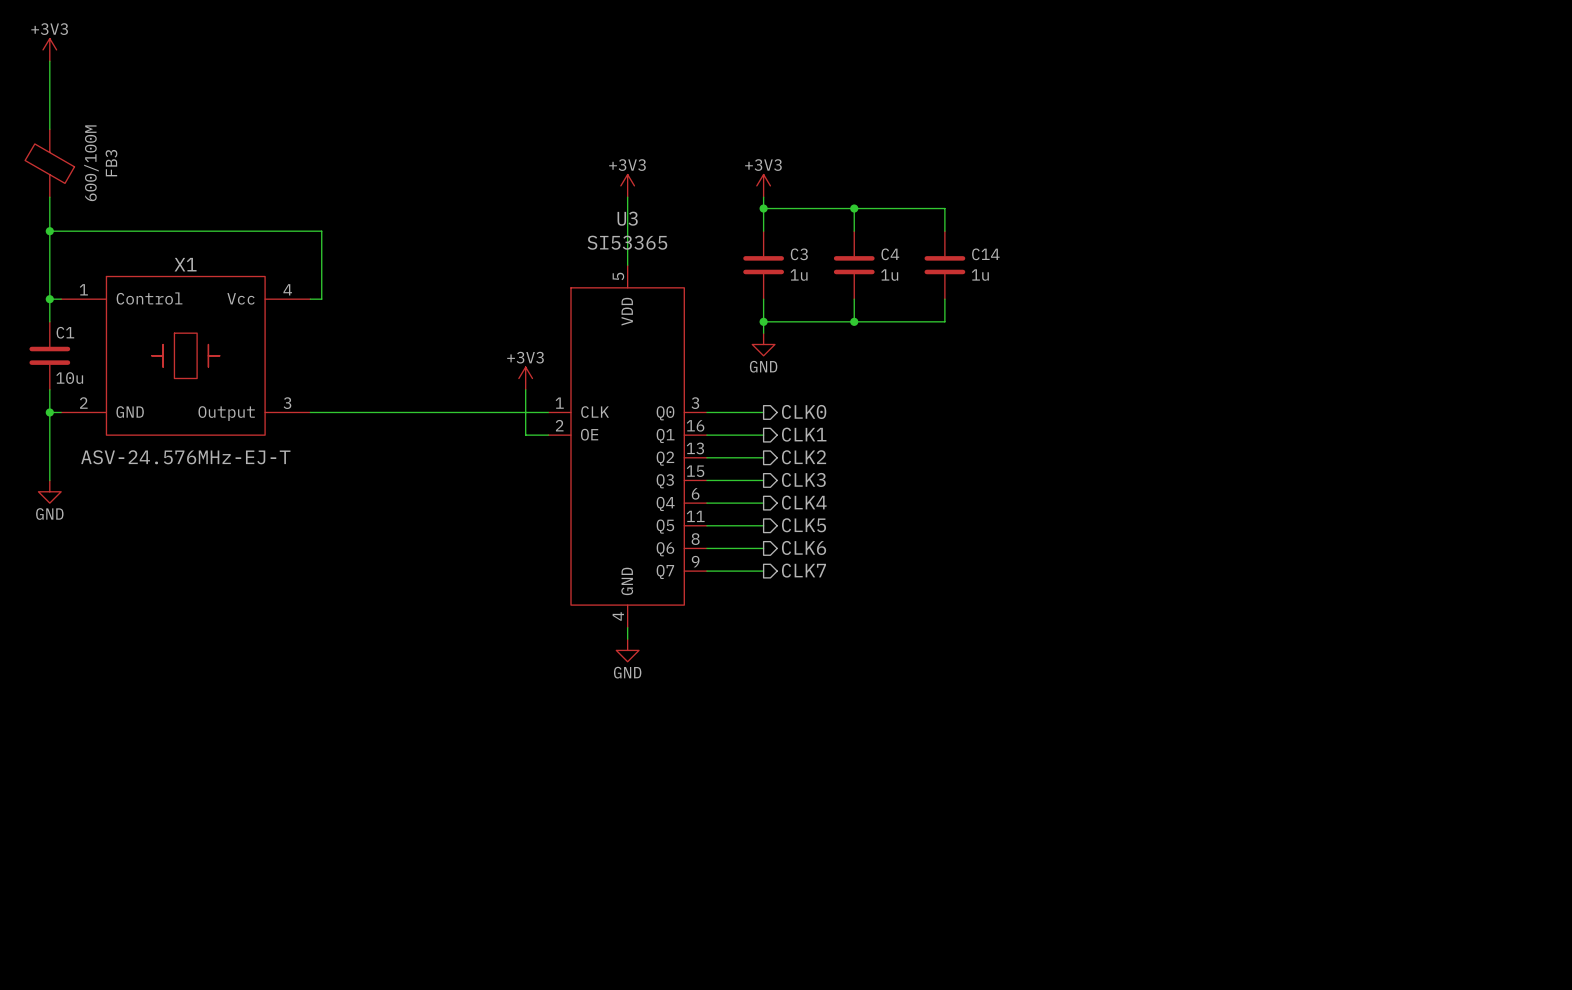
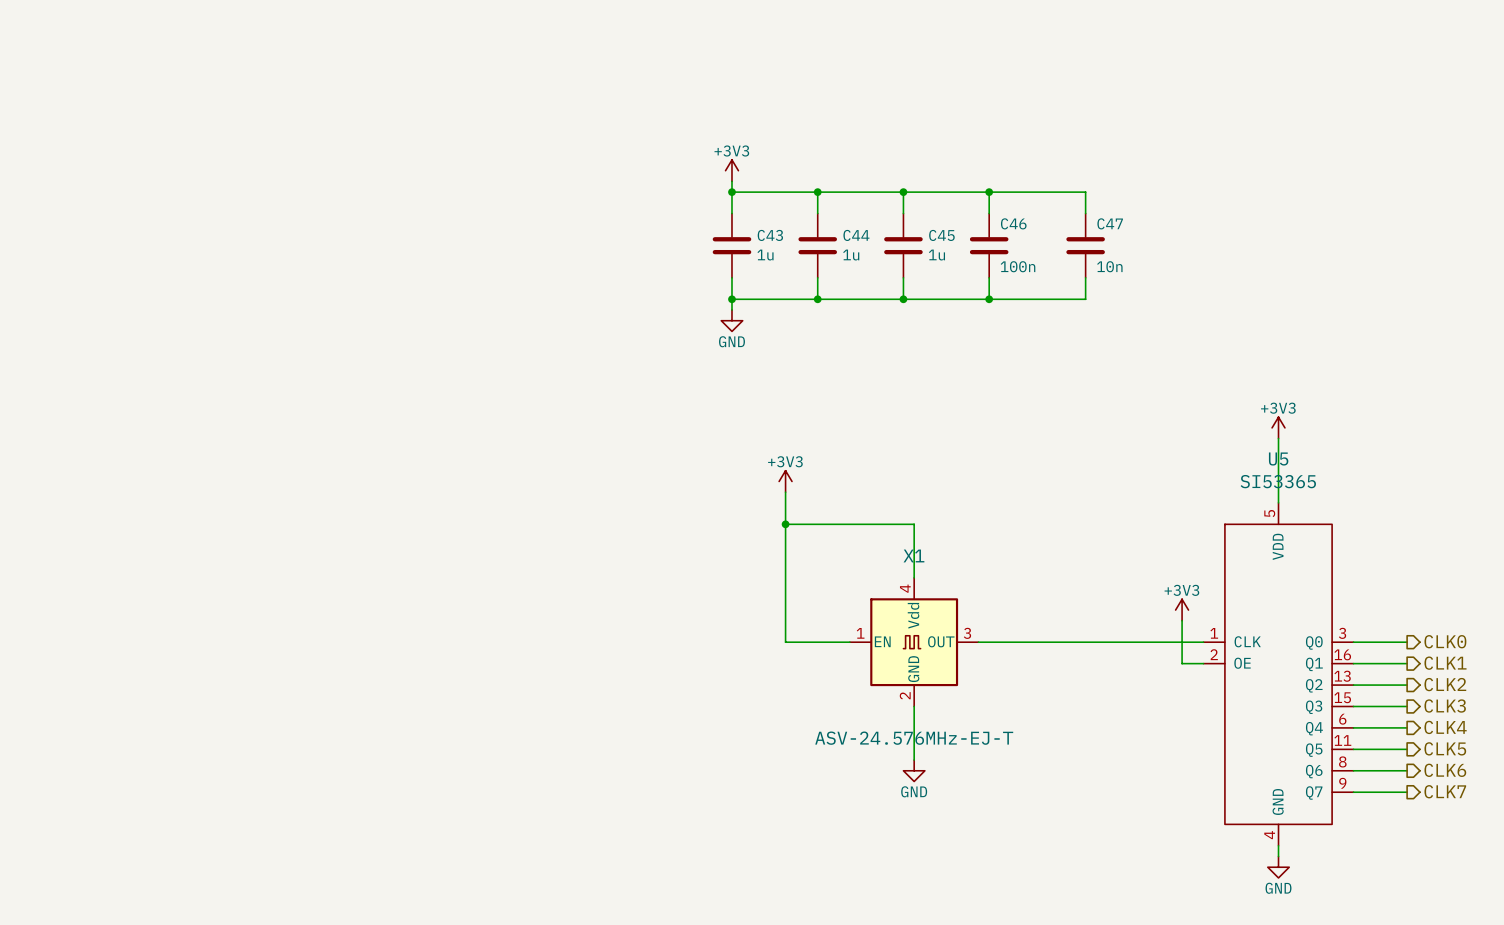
power symbol: +3V3 (49, 49) -> none
wire: (49, 61) (49, 129) -> none
FB3: 600/100M (49, 163) -> none
power symbol: +3V3 (627, 185) -> none
wire: (49, 197) (49, 321) -> none
wire: (627, 197) (627, 265) -> none
wire: none -> (903, 192) (1085, 192) (1085, 213)
junction: none -> (903, 192)
wire: none -> (989, 192) (989, 213)
junction: none -> (989, 192)
wire: (49, 231) (321, 231) (321, 299) (310, 299) -> none
junction: (49, 231) -> none
C3 name: C3 (799, 254) -> C43 (770, 235)
C4 name: C4 (890, 254) -> C44 (856, 235)
C14 name: C14 (985, 254) -> C45 (941, 235)
C46: none -> 100n (989, 245)
C47: none -> 10n (1085, 245)
X1 symbol: [61, 276, 311, 436] -> [849, 577, 979, 707]
wire: (49, 299) (61, 299) -> none
junction: (49, 299) -> none
wire: none -> (989, 277) (989, 299)
wire: none -> (1085, 277) (1085, 299) (903, 299)
junction: none -> (903, 299)
junction: none -> (989, 299)
C1: 10u (49, 355) -> none
power symbol: +3V3 (525, 378) -> none
wire: (49, 389) (49, 480) -> none
wire: (525, 389) (525, 435) (548, 435) -> none
hierarchical label: CLK0 (804, 411) -> none
wire: (49, 412) (61, 412) -> none
junction: (49, 412) -> none
wire: (310, 412) (548, 412) -> none
wire: (706, 412) (763, 412) -> none
hierarchical label: CLK1 (804, 434) -> none
wire: (706, 435) (763, 435) -> none
U3: SI53365 (627, 446) -> none
wire: (706, 457) (763, 457) -> none
hierarchical label: CLK2 (804, 457) -> none
power symbol: none -> +3V3 (1278, 427)
wire: none -> (1278, 438) (1278, 502)
hierarchical label: CLK3 (803, 479) -> none
wire: (706, 480) (763, 480) -> none
power symbol: GND (49, 491) -> none
hierarchical label: CLK4 (804, 502) -> none
wire: (706, 503) (763, 503) -> none
power symbol: none -> +3V3 (785, 481)
wire: (706, 525) (763, 525) -> none
hierarchical label: CLK5 (804, 525) -> none
wire: none -> (785, 492) (785, 642) (849, 642)
hierarchical label: CLK6 (804, 547) -> none
wire: (706, 548) (763, 548) -> none
wire: none -> (785, 524) (914, 524) (914, 577)
junction: none -> (785, 524)
hierarchical label: CLK7 (803, 570) -> none
wire: (706, 571) (763, 571) -> none
wire: (627, 627) (627, 639) -> none
power symbol: GND (627, 650) -> none
power symbol: none -> +3V3 (1182, 610)
wire: none -> (1182, 620) (1182, 663) (1203, 663)
hierarchical label: none -> CLK0 (1445, 641)
wire: none -> (978, 642) (1203, 642)
wire: none -> (1353, 642) (1407, 642)
hierarchical label: none -> CLK1 (1445, 663)
wire: none -> (1353, 663) (1407, 663)
U5: none -> SI53365 (1278, 674)
wire: none -> (1353, 685) (1407, 685)
hierarchical label: none -> CLK2 (1445, 684)
hierarchical label: none -> CLK3 (1445, 706)
wire: none -> (914, 706) (914, 760)
wire: none -> (1353, 706) (1407, 706)
hierarchical label: none -> CLK4 (1445, 727)
wire: none -> (1353, 727) (1407, 727)
wire: none -> (1353, 749) (1407, 749)
hierarchical label: none -> CLK5 (1445, 748)
hierarchical label: none -> CLK6 (1445, 770)
power symbol: none -> GND (914, 770)
wire: none -> (1353, 770) (1407, 770)
hierarchical label: none -> CLK7 (1445, 791)
wire: none -> (1353, 792) (1407, 792)
wire: none -> (1278, 845) (1278, 856)
power symbol: none -> GND (1278, 867)

